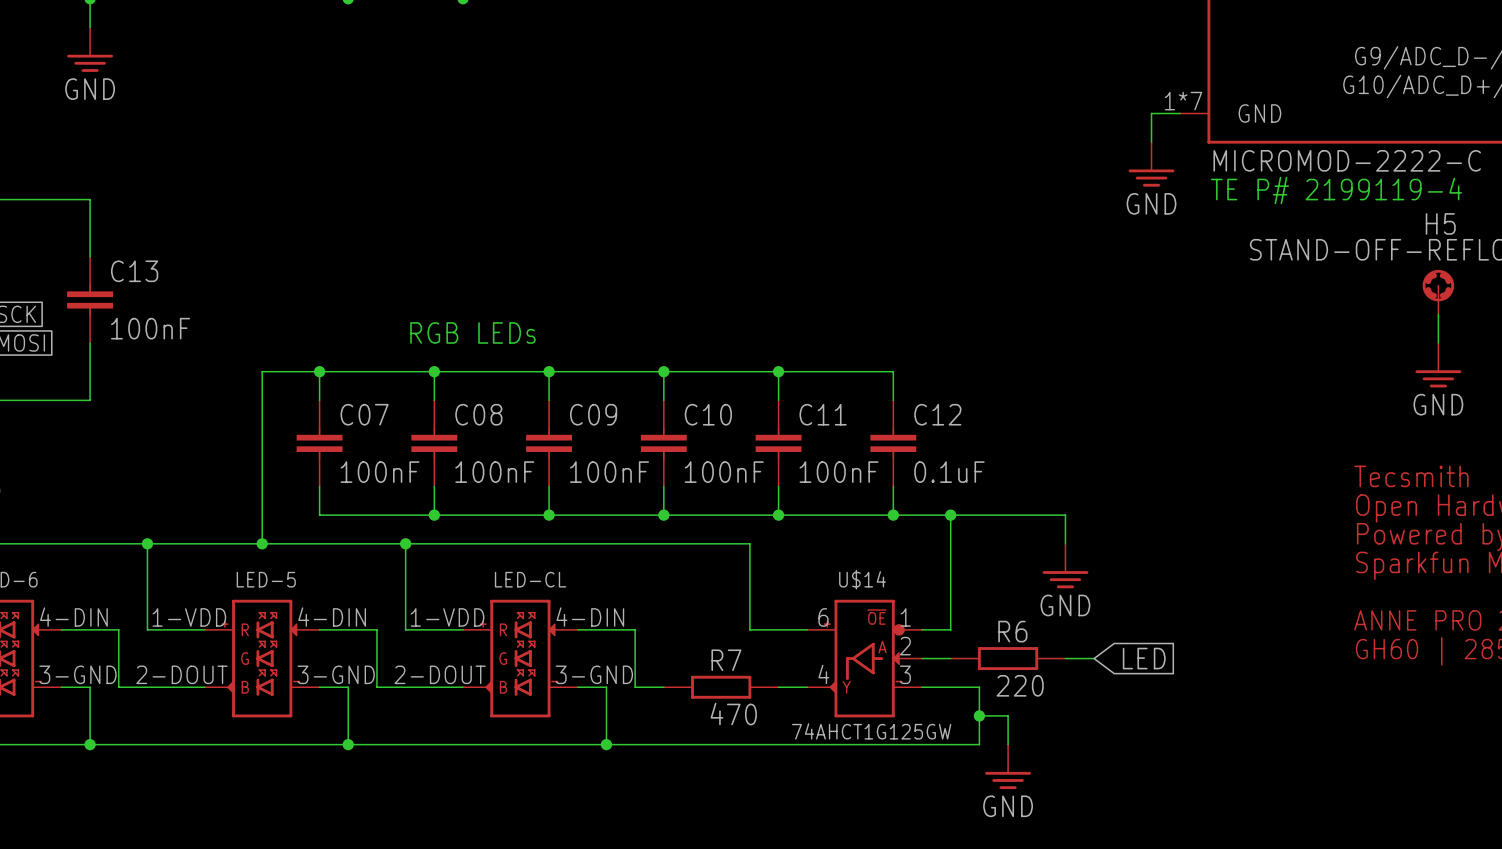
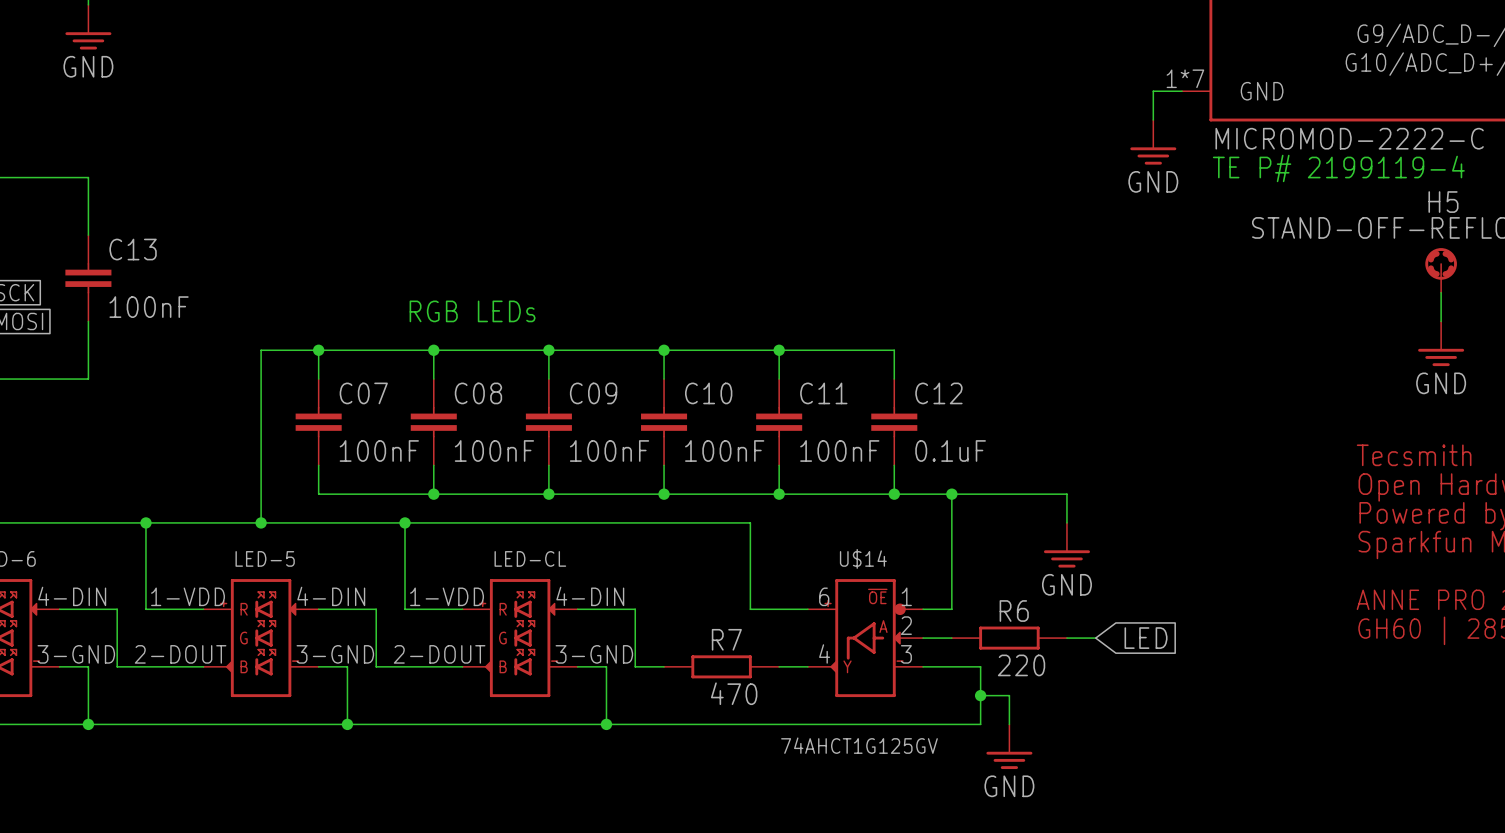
U$14 value: 74AHCT1G125GW (871, 731) -> 74AHCT1G125GV (859, 745)

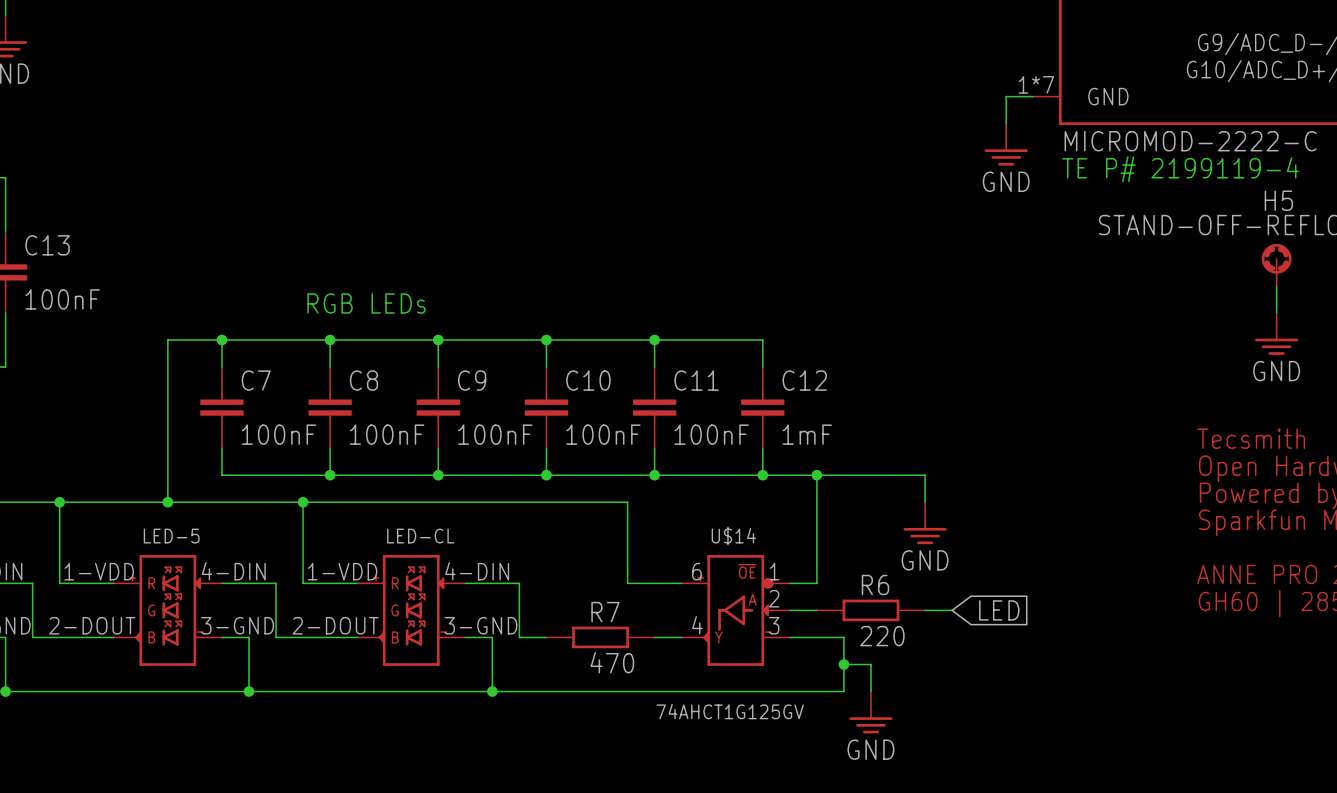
C07 name: C07 (363, 393) -> C7 (256, 380)
C08 name: C08 (478, 393) -> C8 (363, 380)
C09 name: C09 (593, 393) -> C9 (472, 380)
C12 value: 0.1uF (950, 450) -> 1mF (807, 434)

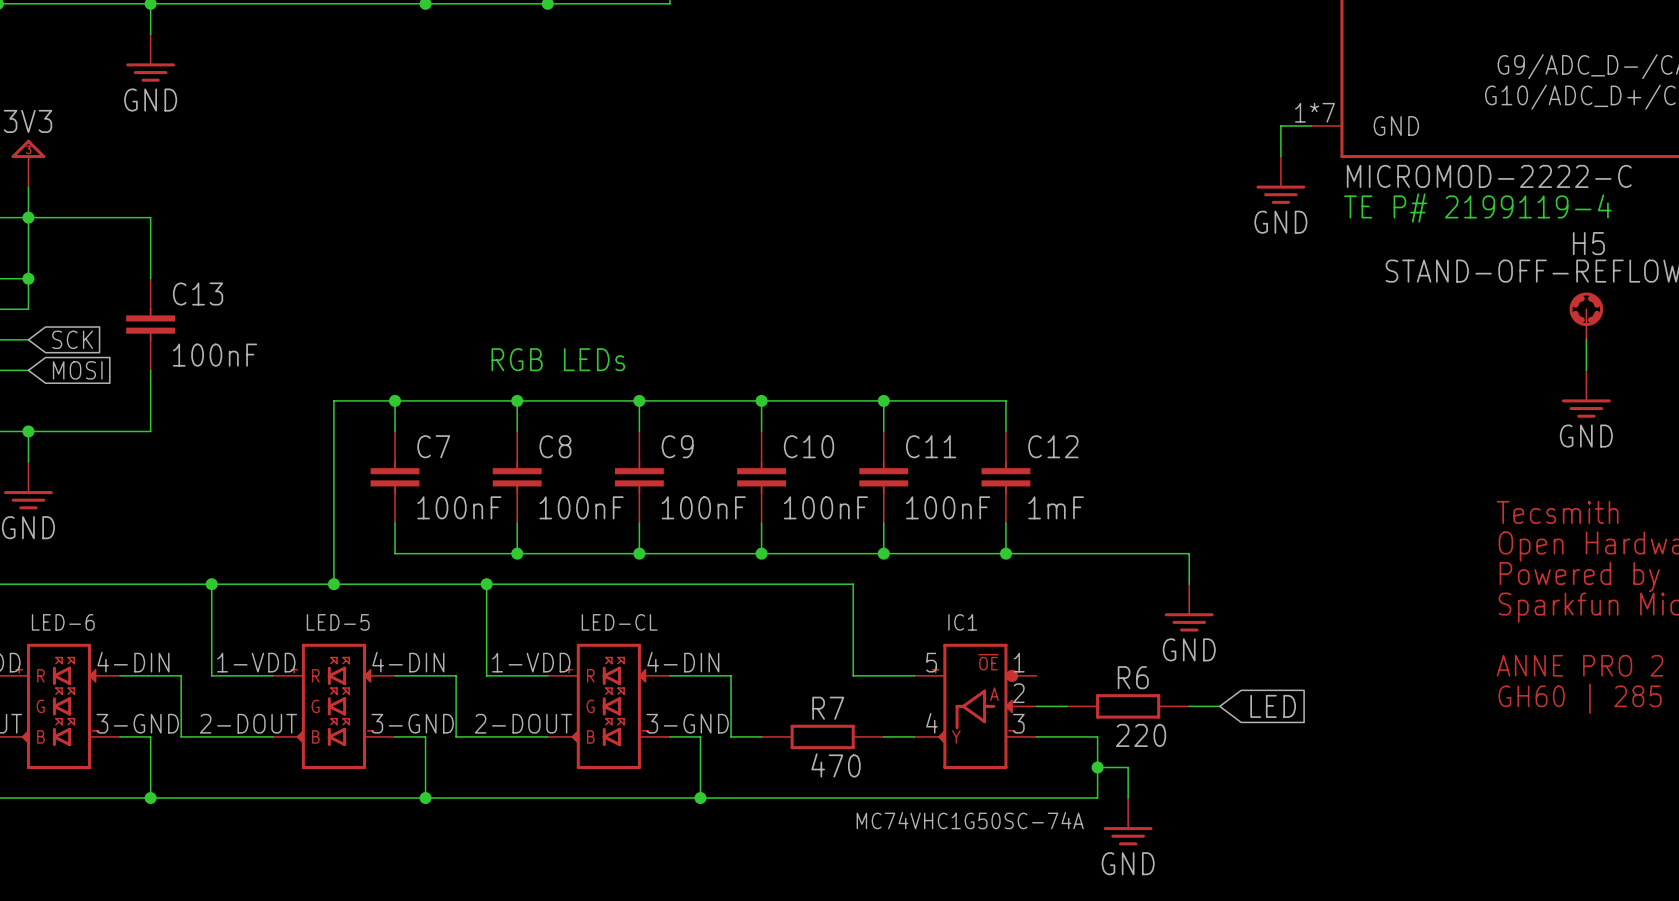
wire: (816, 475) (816, 583) (789, 583) -> none
junction: (816, 475) -> none
U$14 name: U$14 (733, 536) -> IC1 (962, 622)
U$14 pin number: 6 (696, 571) -> 5 (931, 662)
U$14 value: 74AHCT1G125GV (730, 711) -> MC74VHC1G50SC-74A (970, 820)

